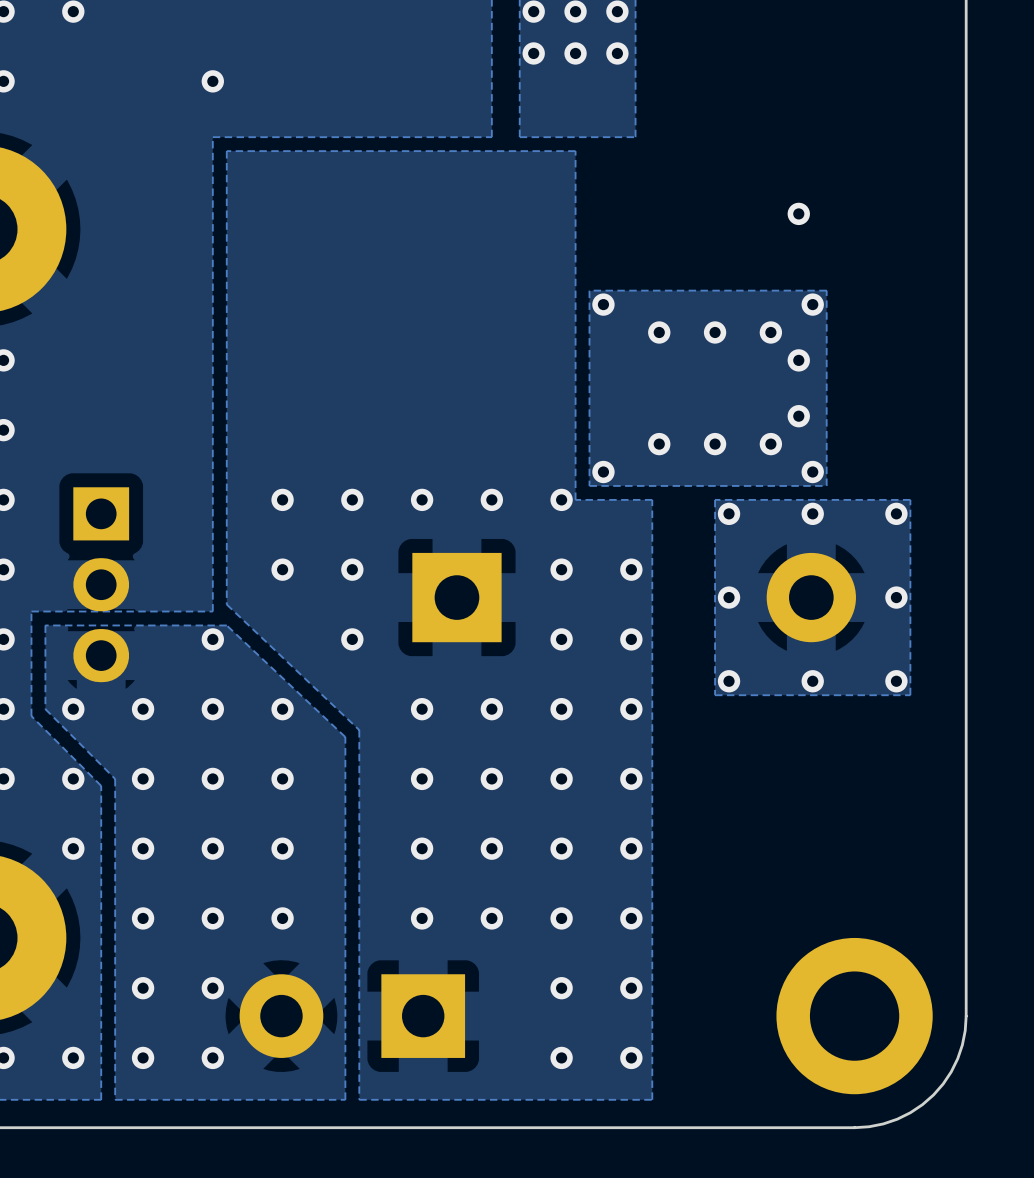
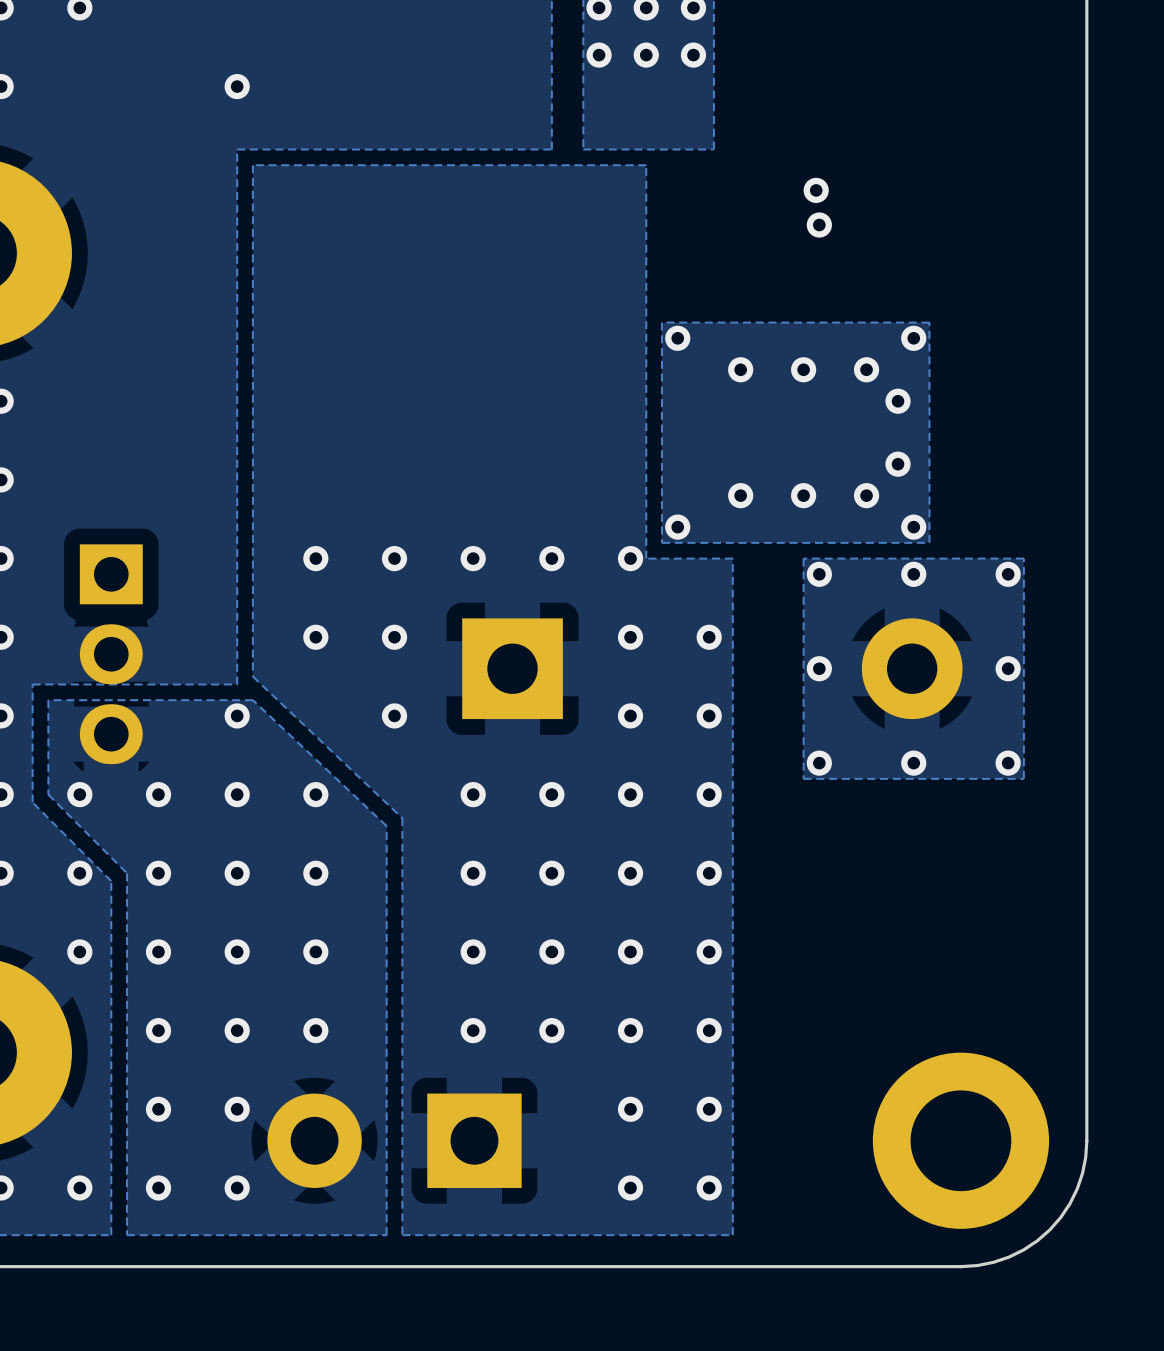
via: none -> (816, 190)
via: none -> (819, 225)
via: (798, 213) -> none

